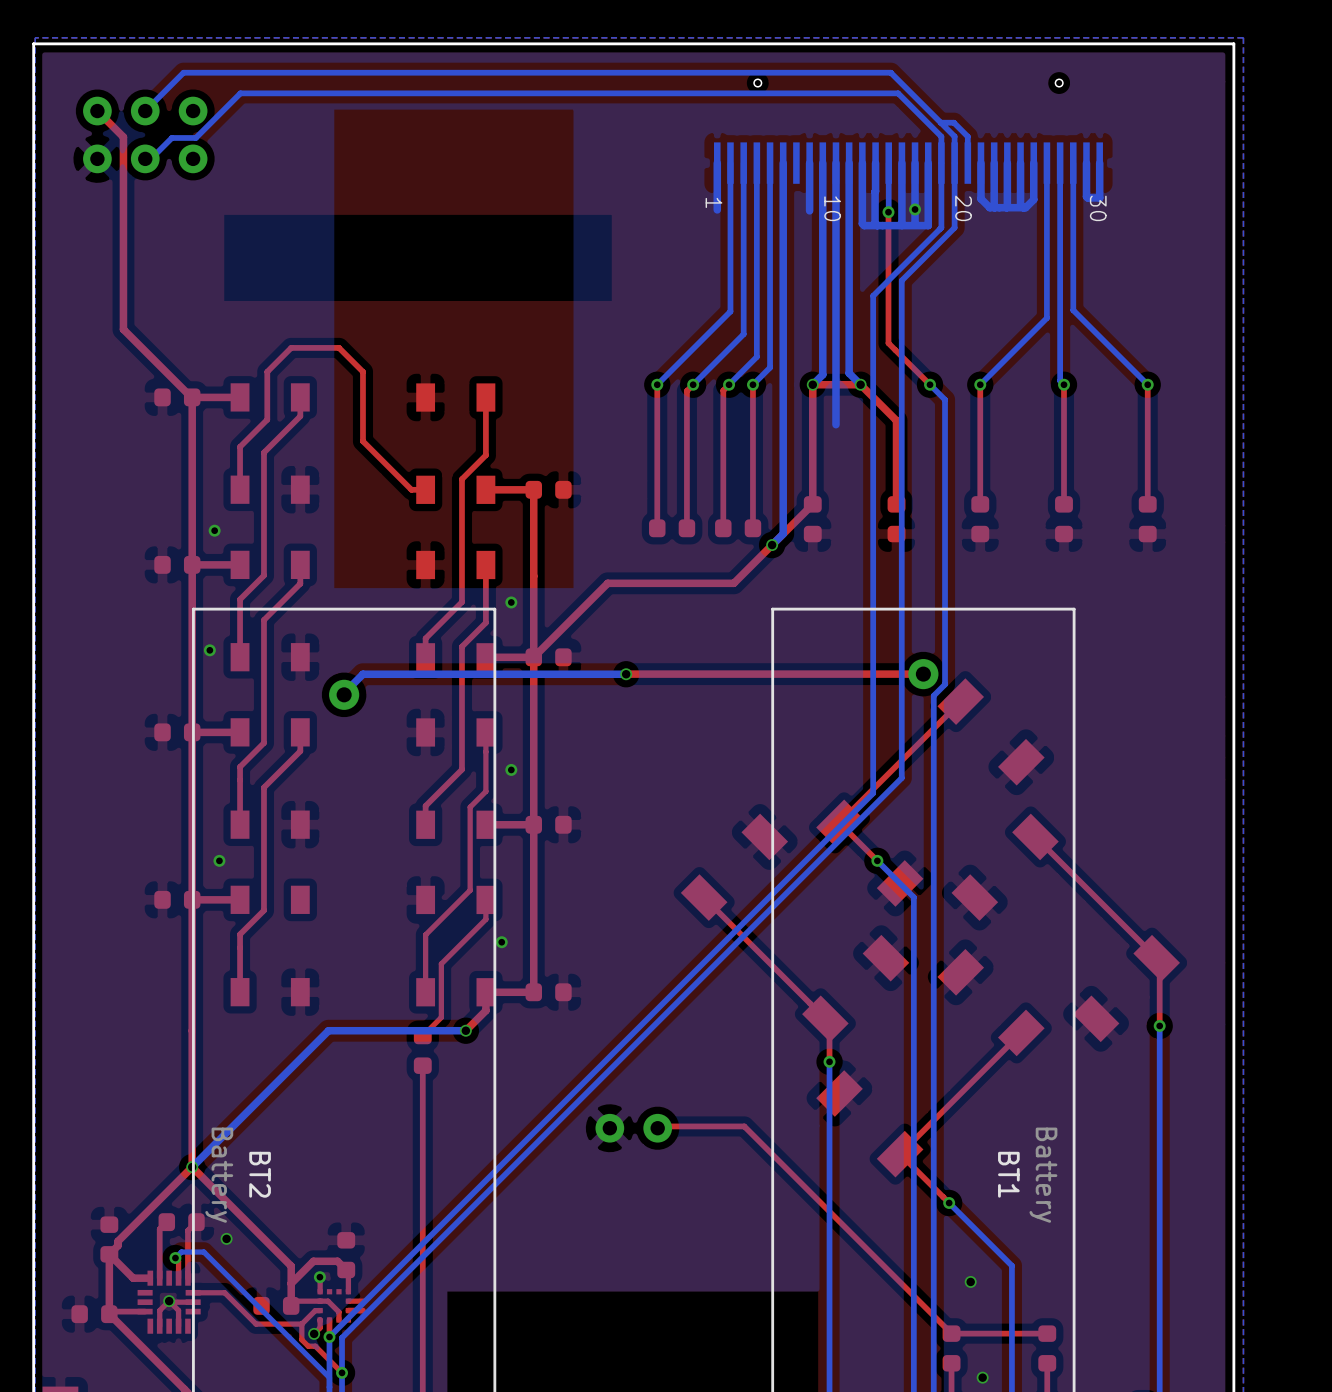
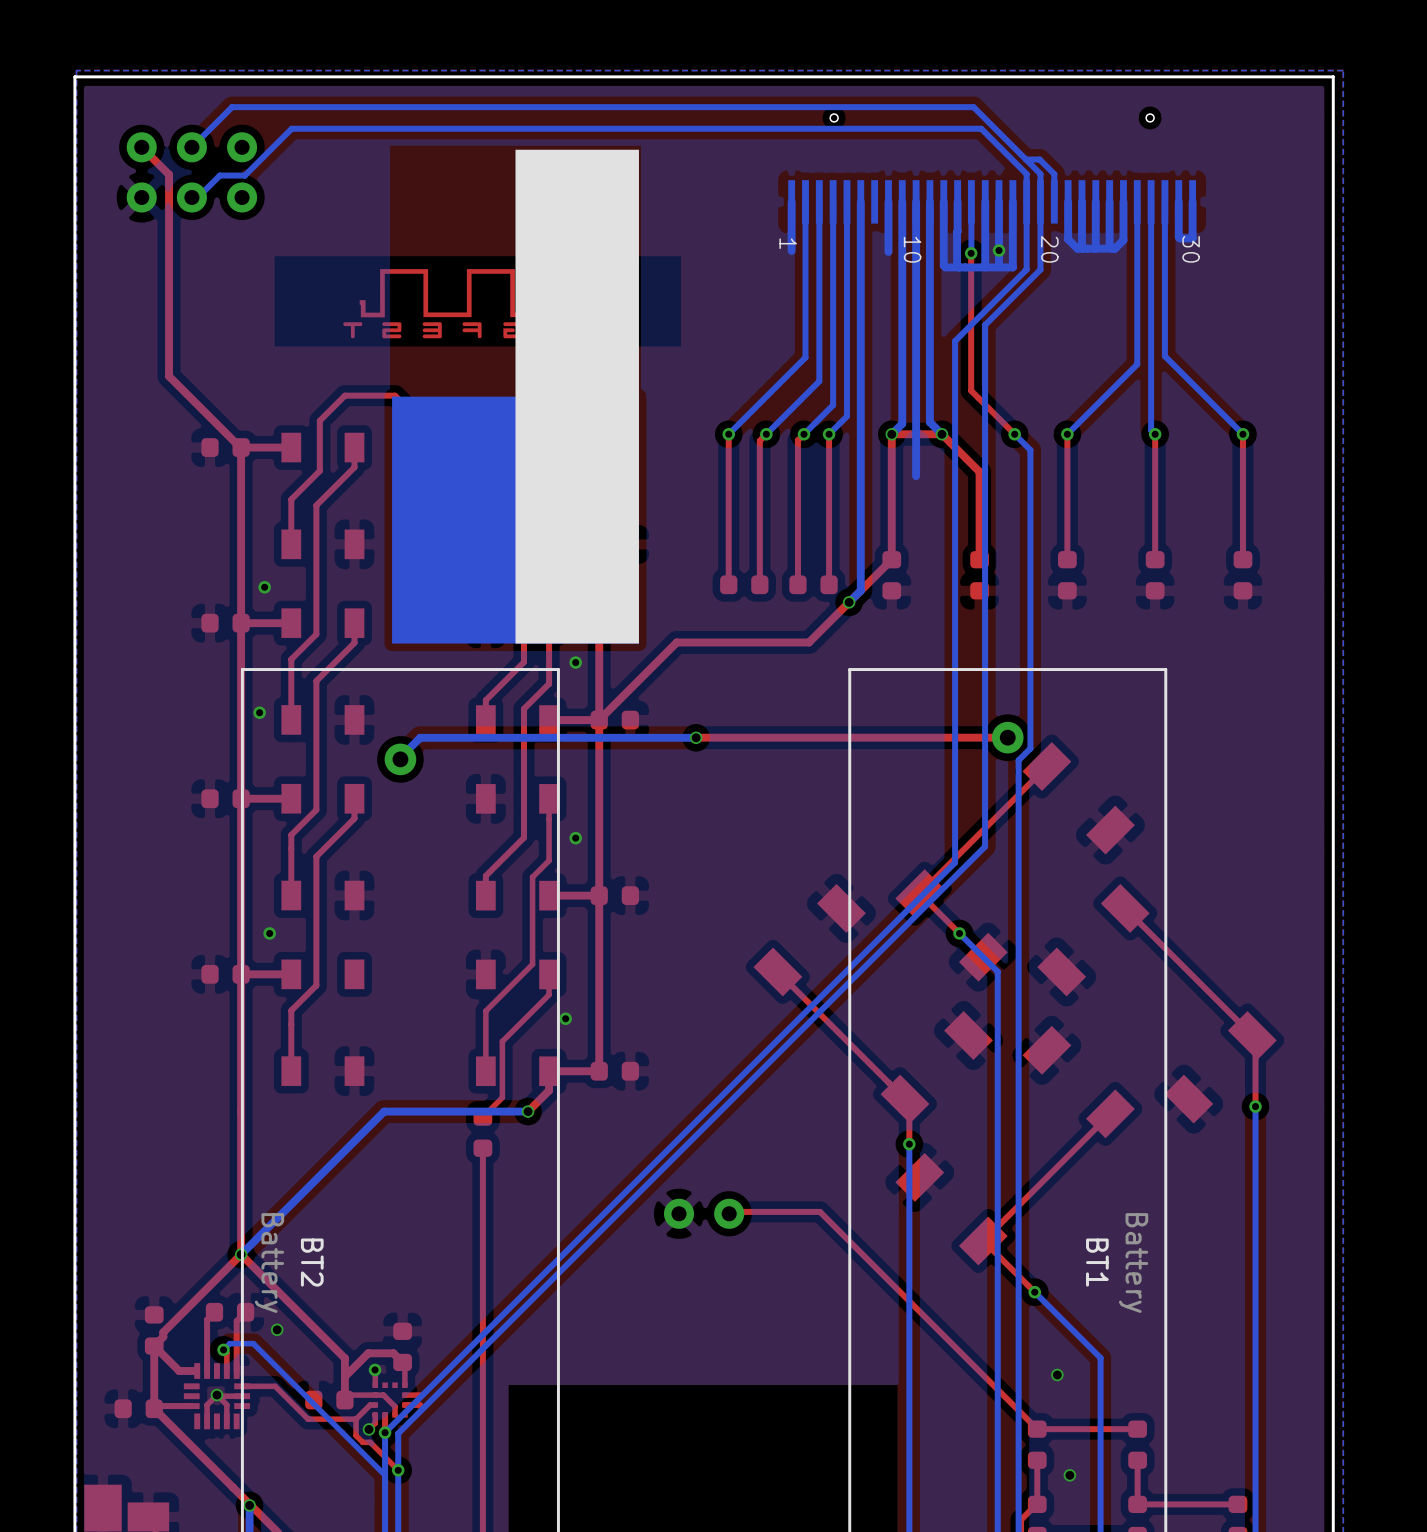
drawing: none -> [343, 149, 639, 644]

